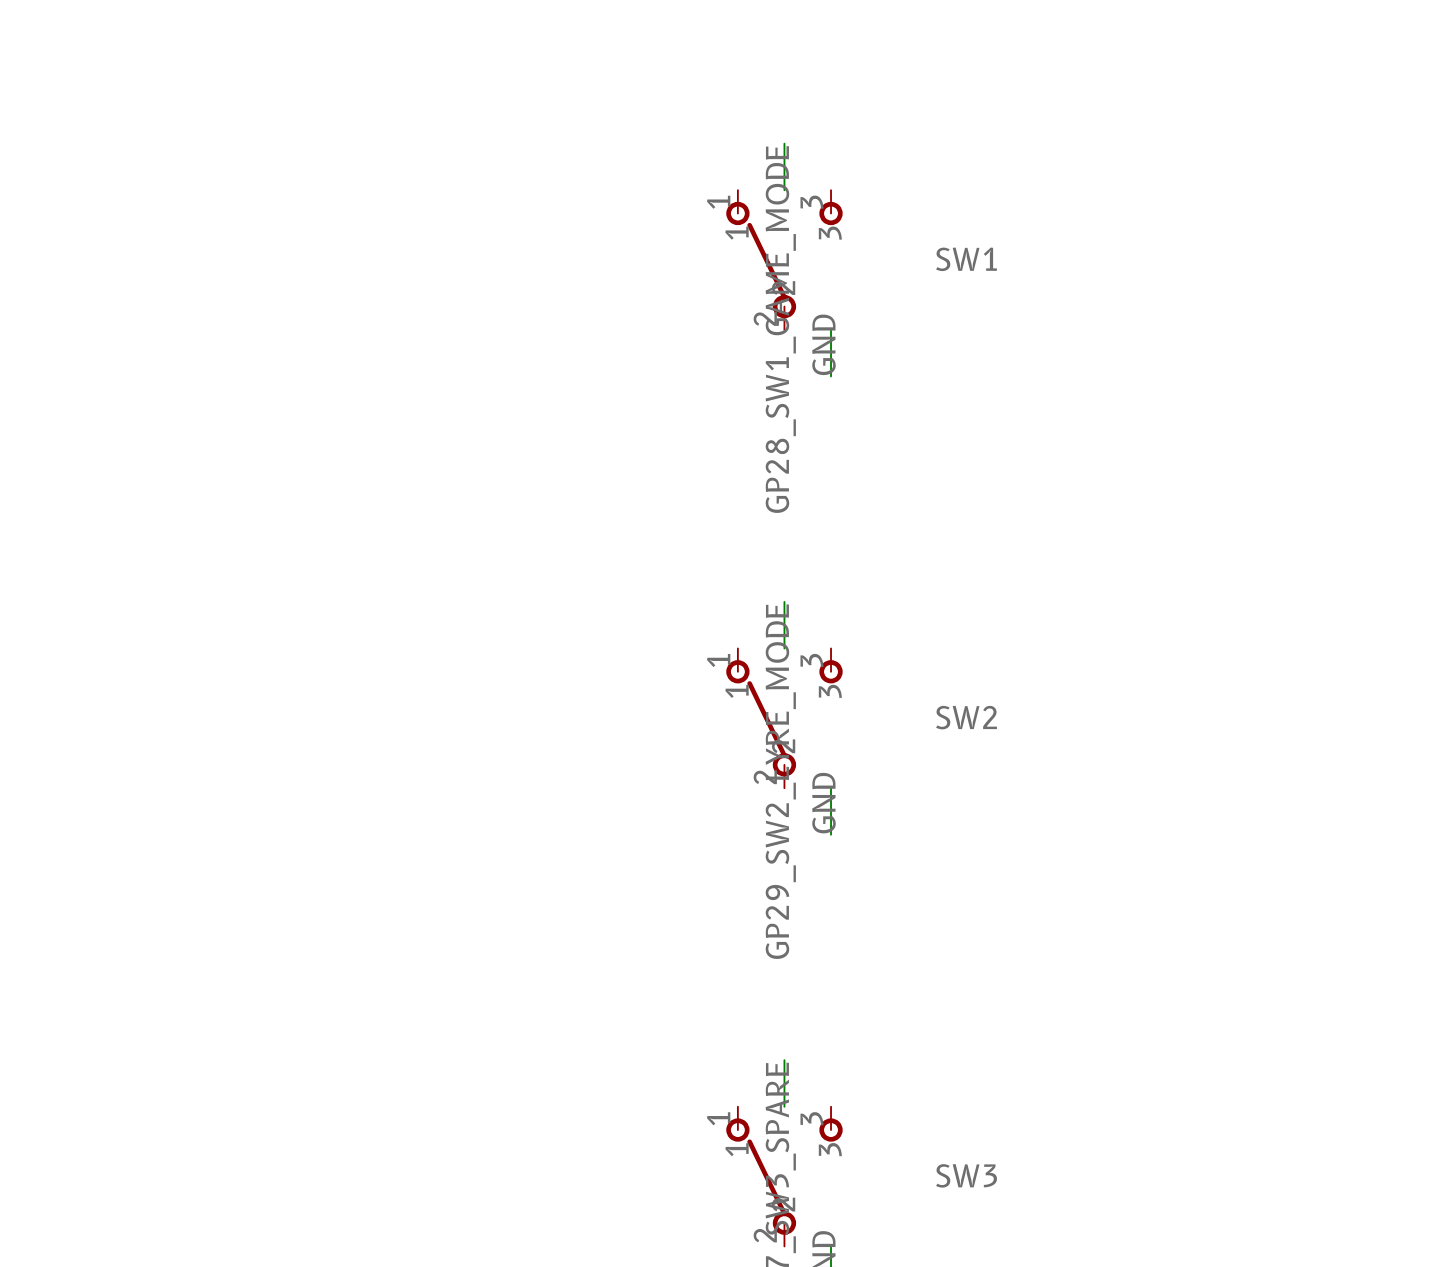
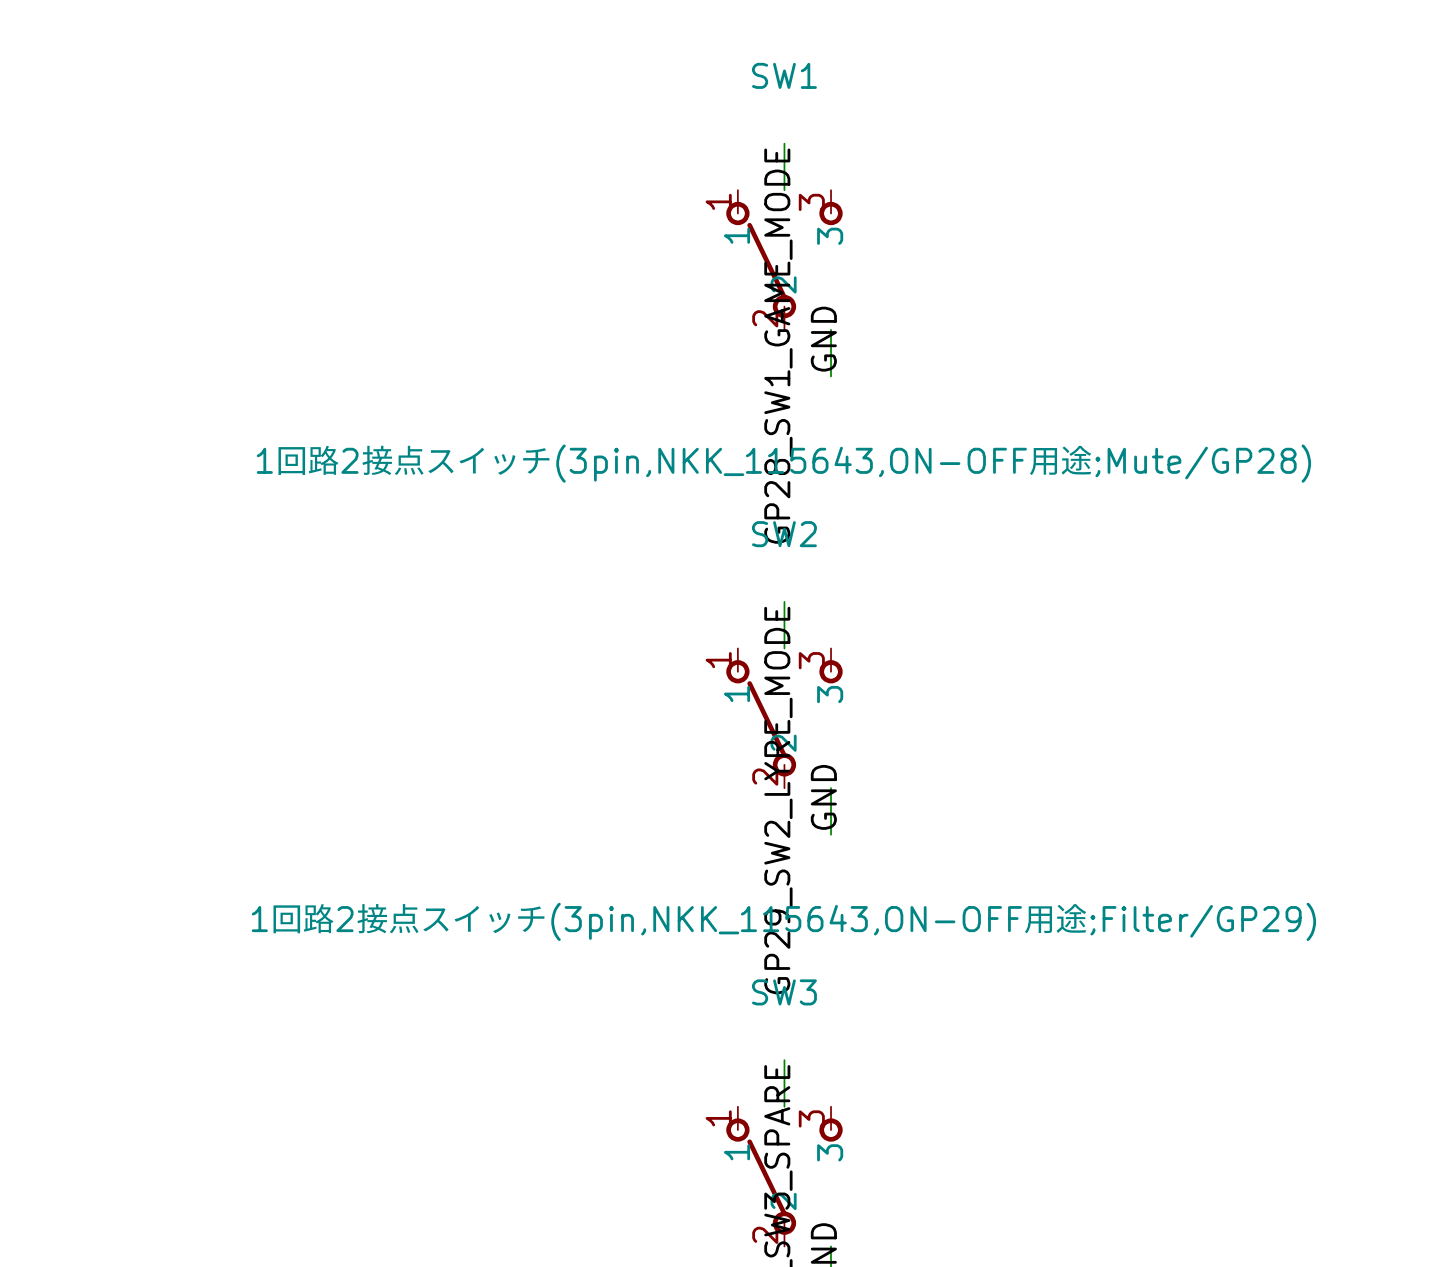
SW1 name position: SW1 (966, 259) -> SW1 (784, 75)
SW1 value: none -> 1回路2接点スイッチ(3pin,NKK_115643,ON-OFF用途;Mute/GP28) (783, 463)
SW2 name position: SW2 (966, 717) -> SW2 (784, 534)
SW2 value: none -> 1回路2接点スイッチ(3pin,NKK_115643,ON-OFF用途;Filter/GP29) (783, 921)
SW3 name position: SW3 (966, 1175) -> SW3 (784, 992)

